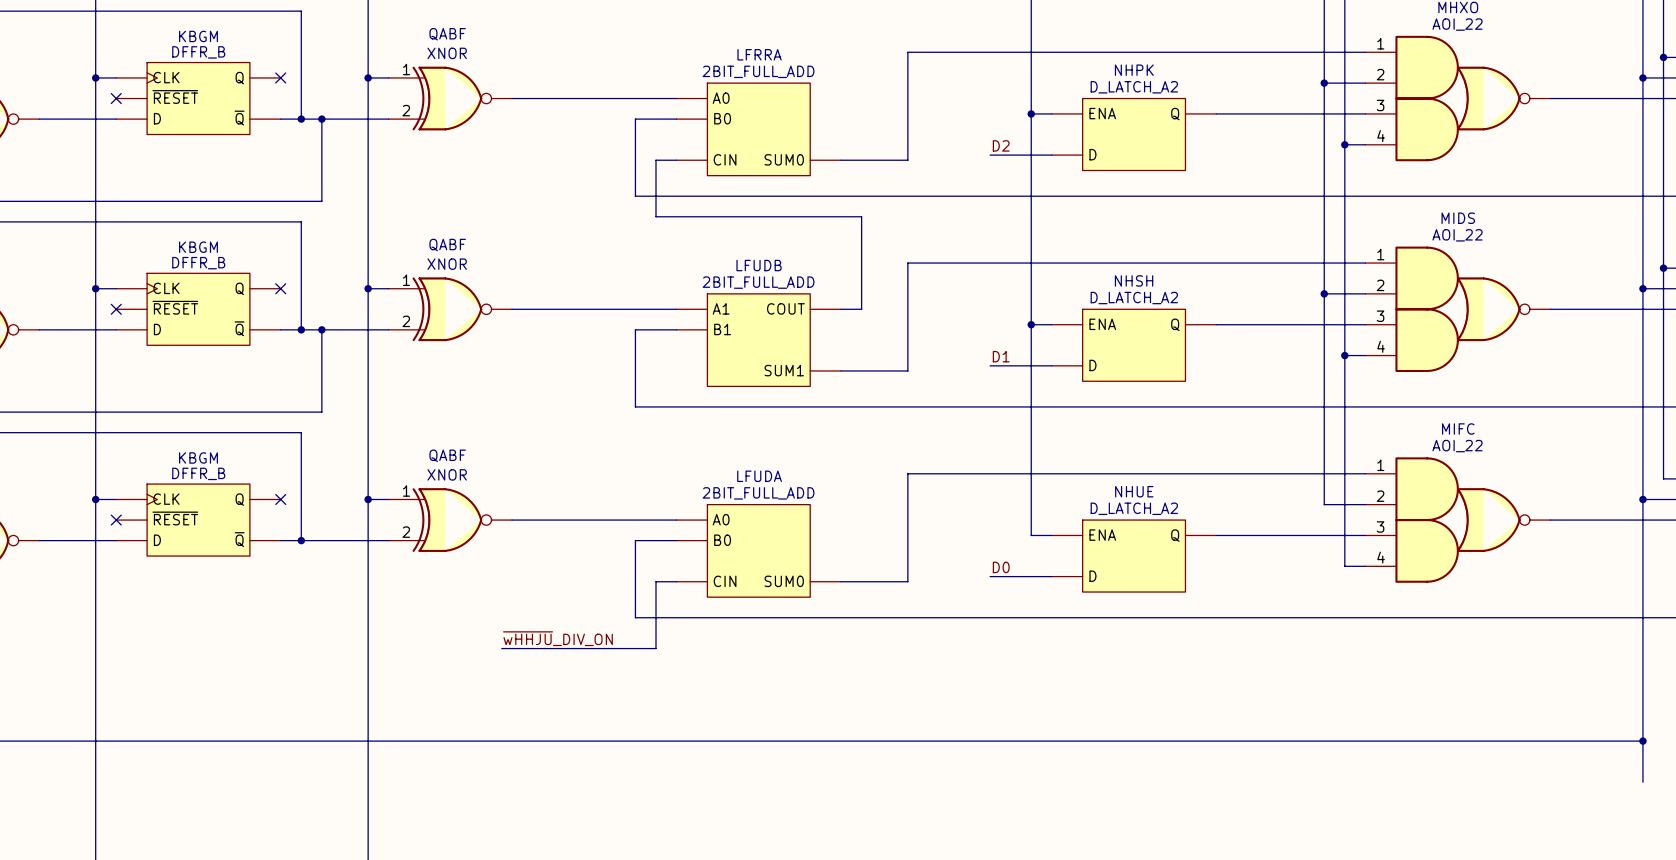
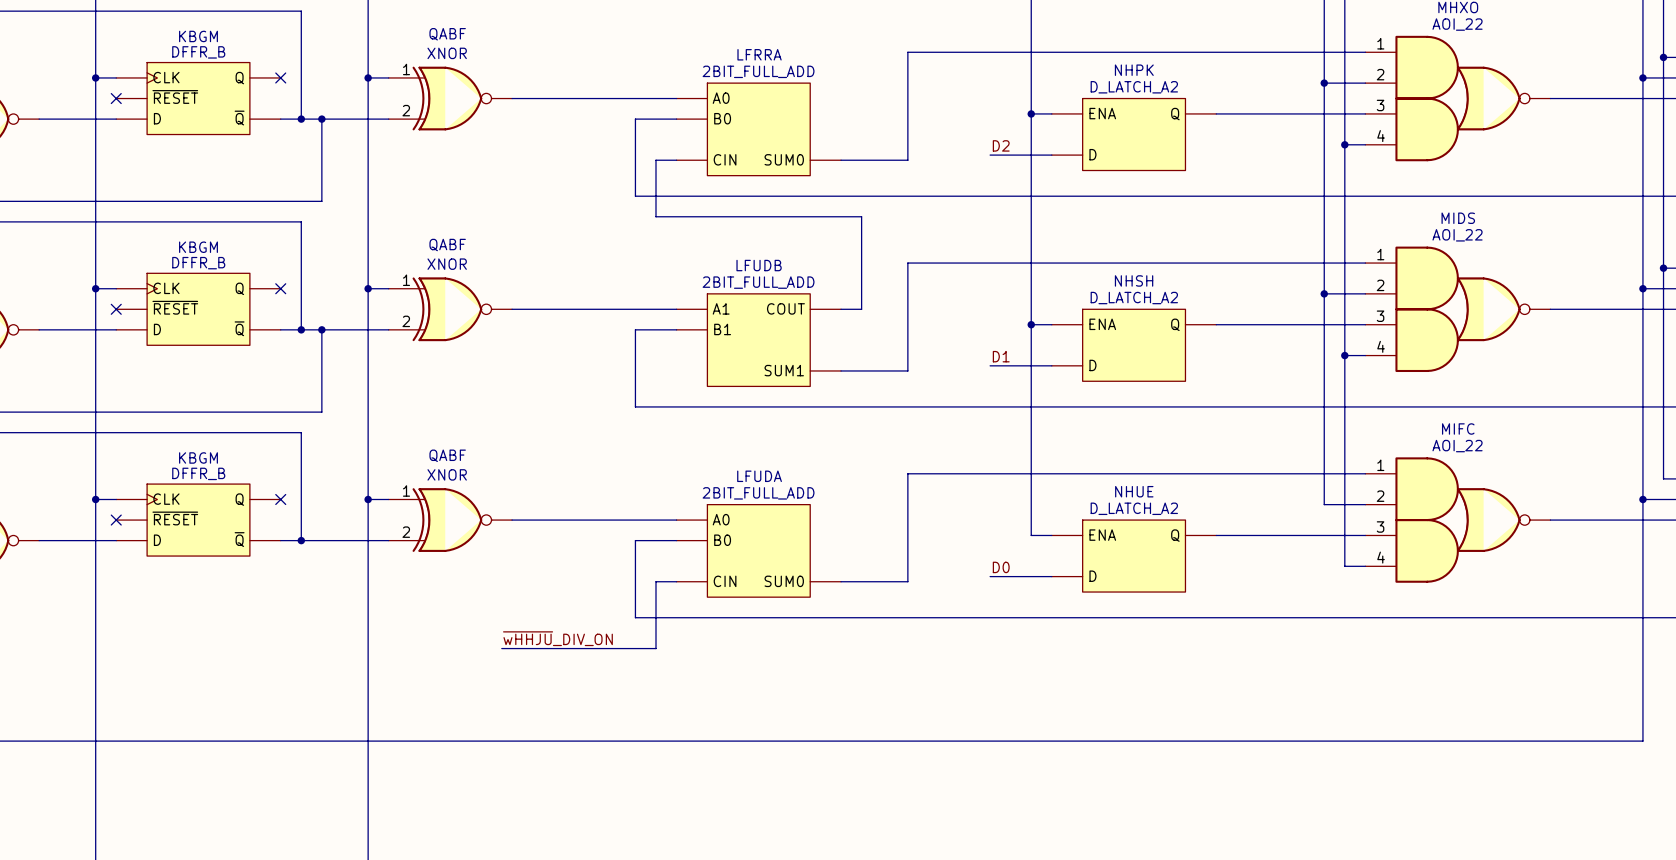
wire: (1642, 741) (1642, 782) -> none
junction: (1642, 741) -> none

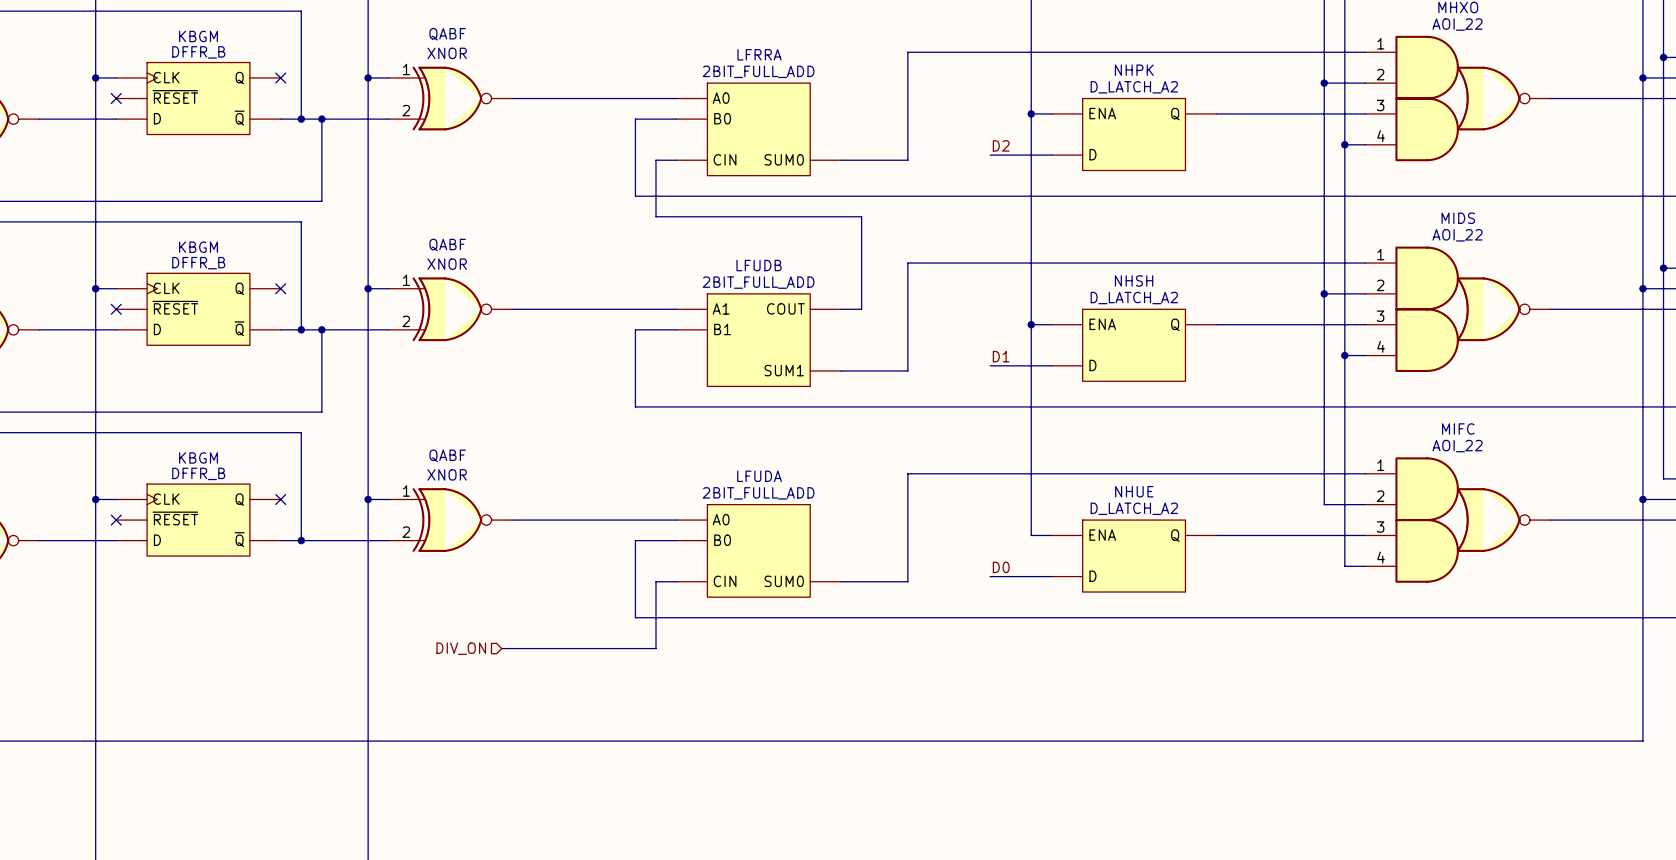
label: ~{wHHJU}_DIV_ON (557, 638) -> none
hierarchical label: none -> DIV_ON (461, 648)

